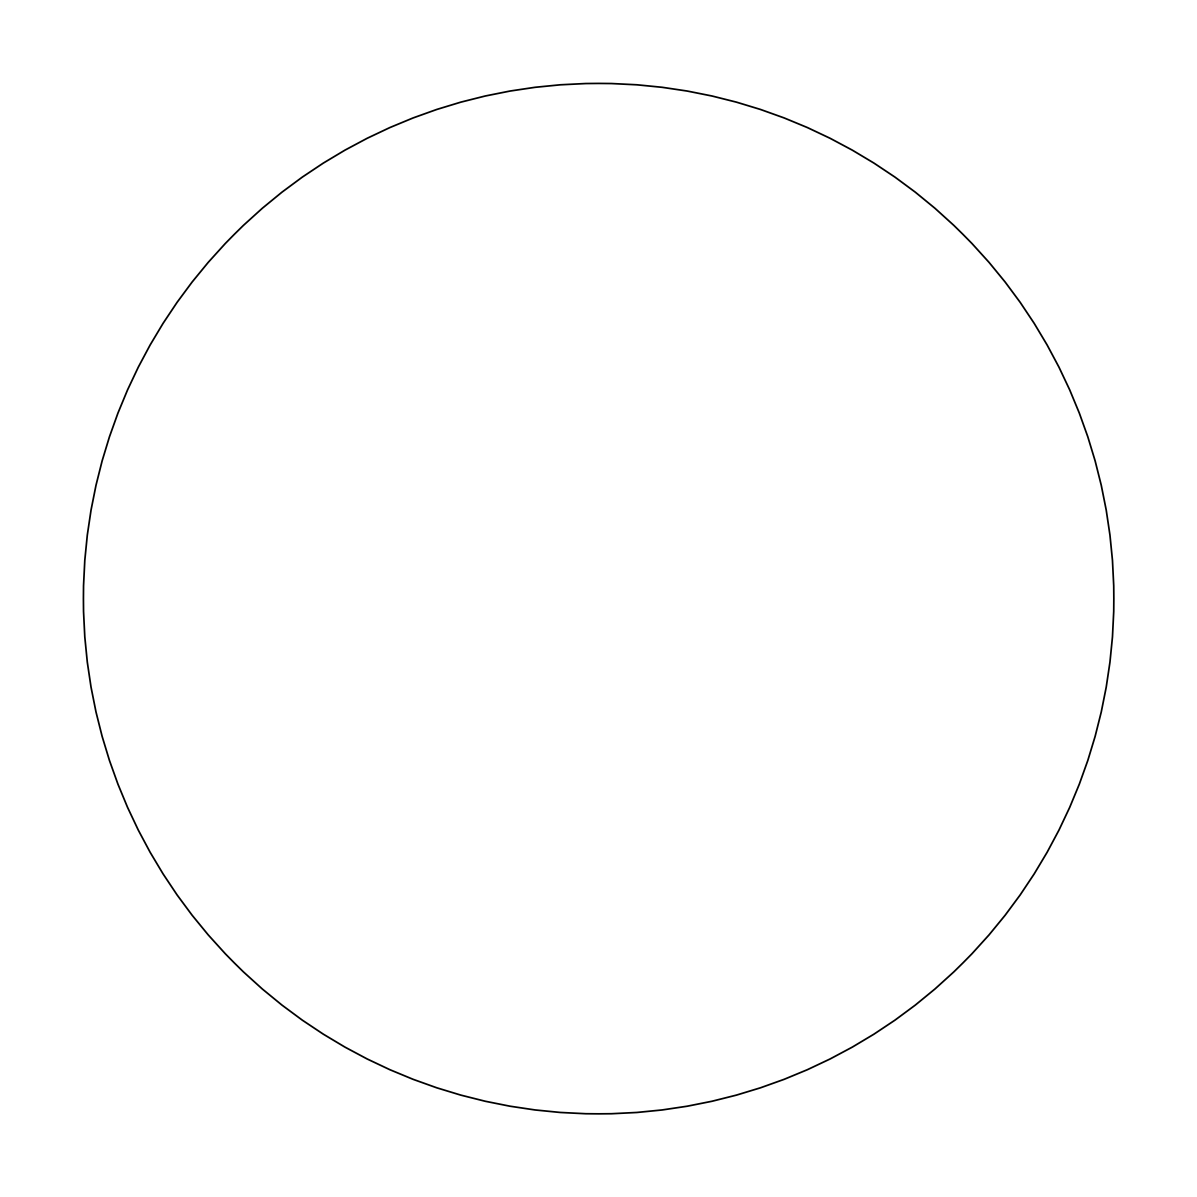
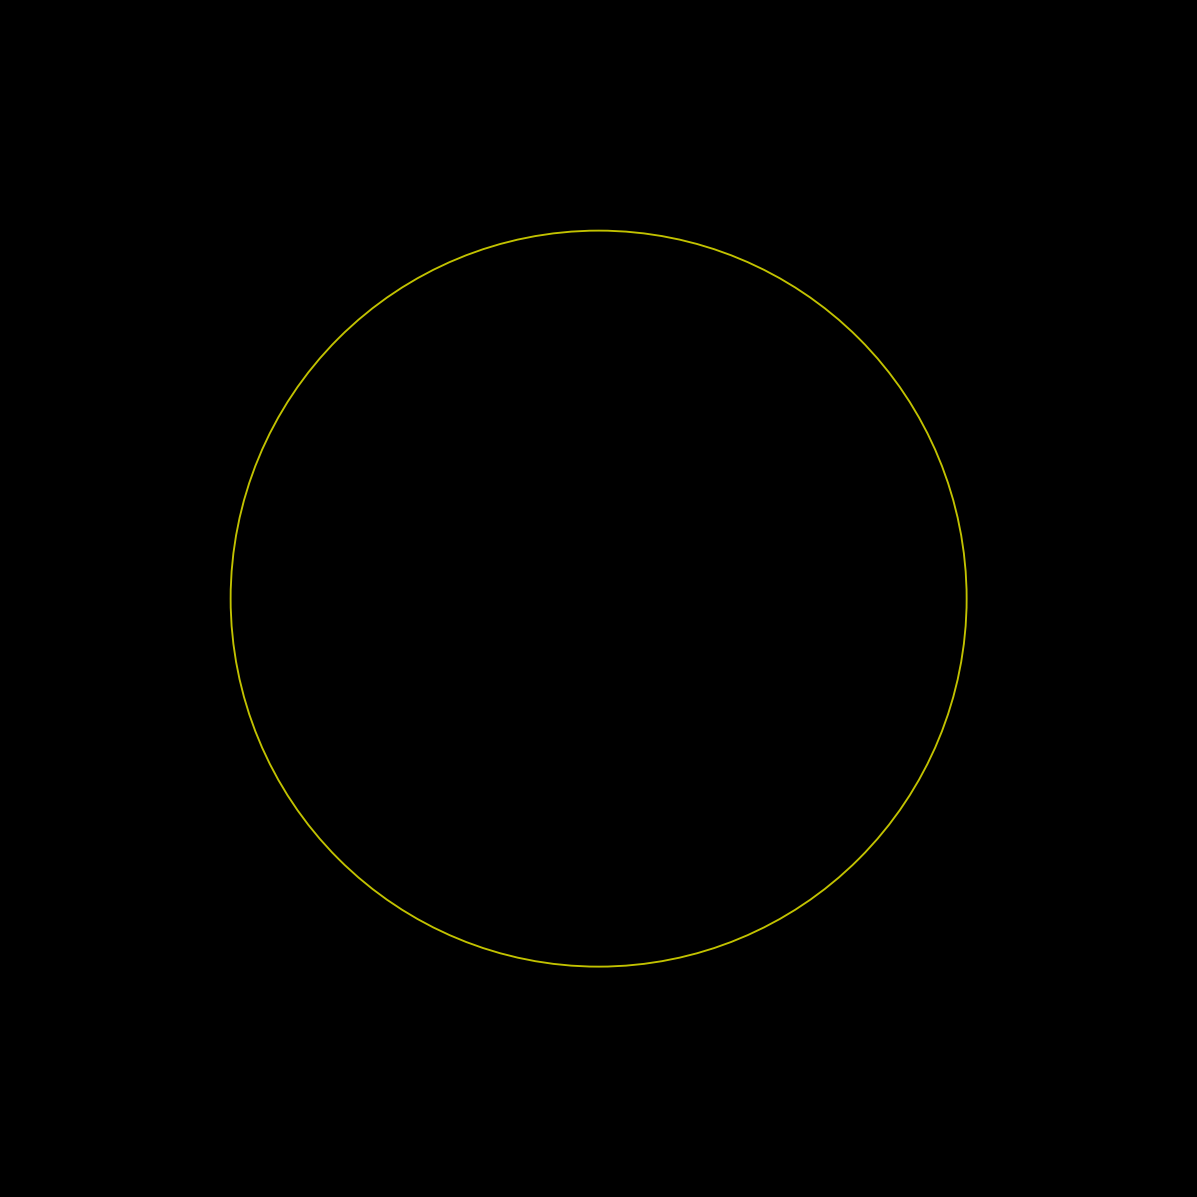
round board edge size: [83, 83, 1115, 1115] -> [230, 230, 968, 968]

